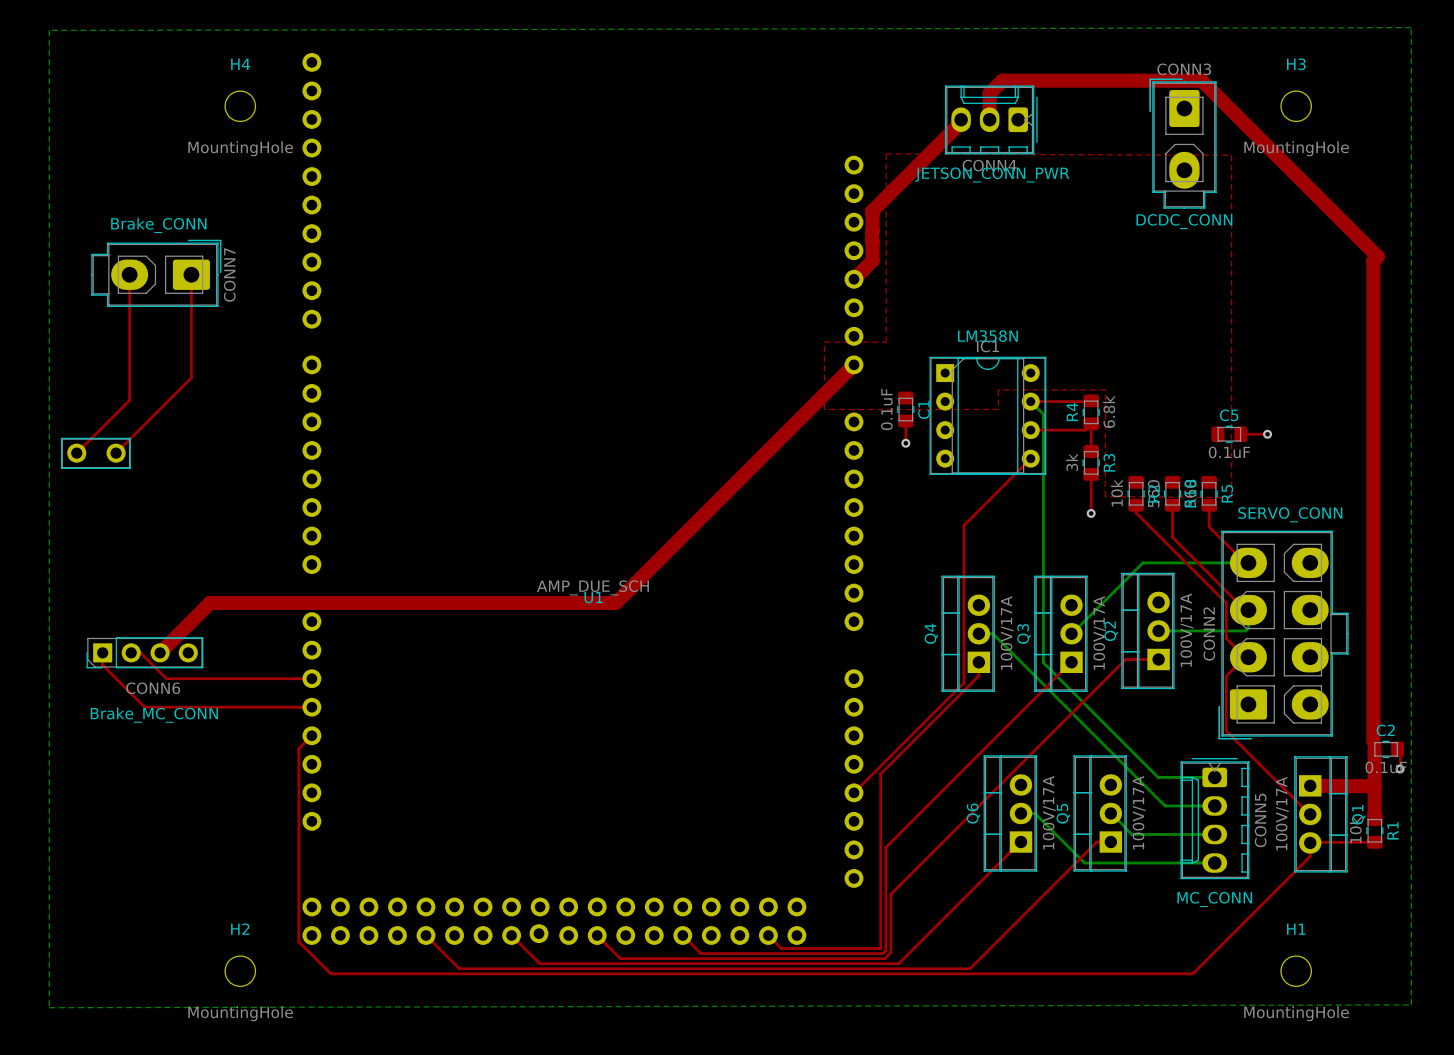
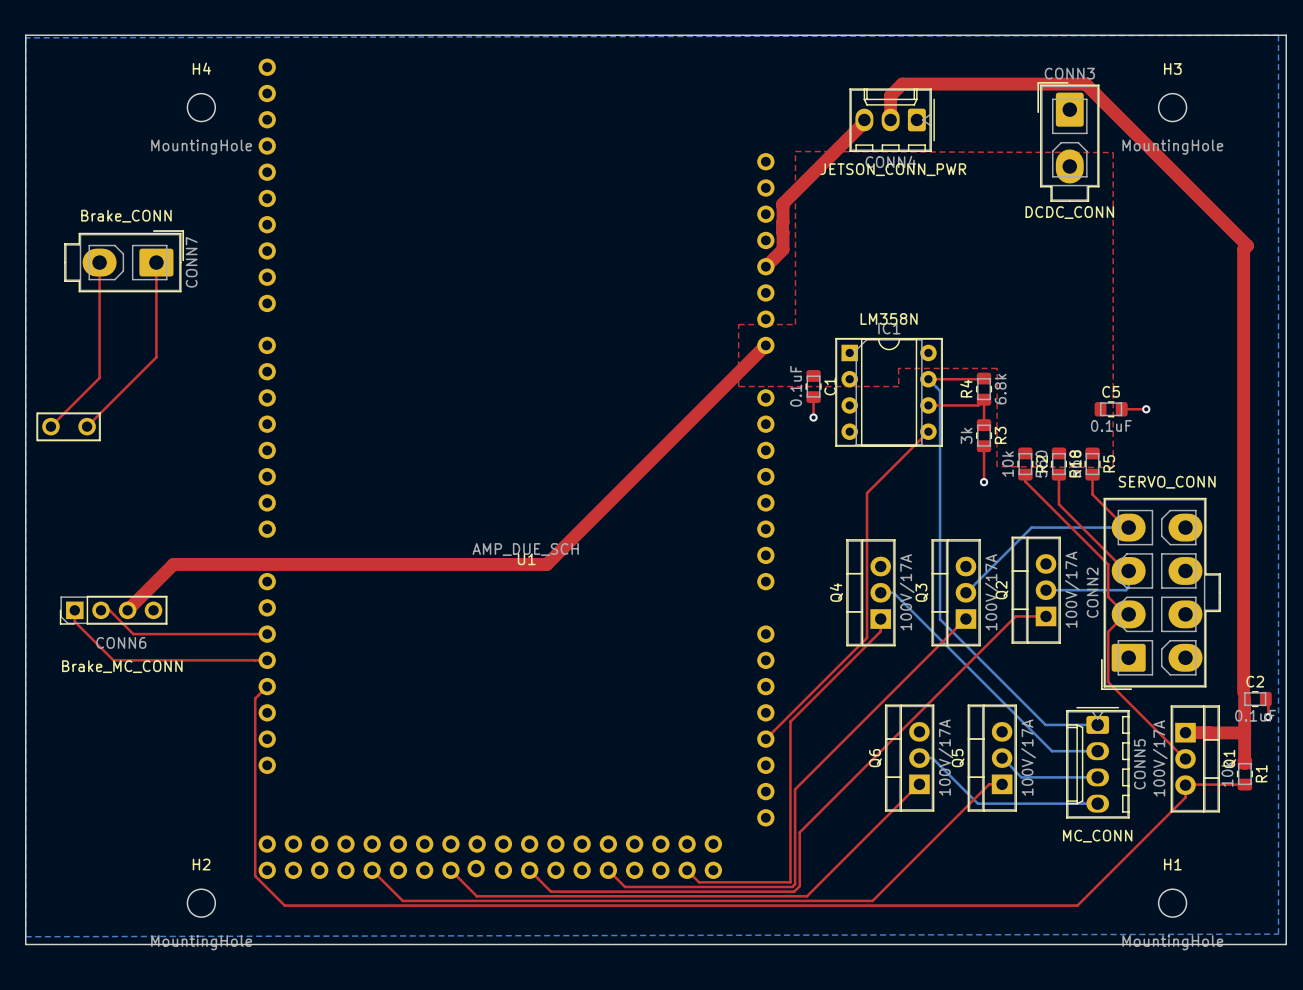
board edge: none -> (25, 35) (1286, 35) (1286, 944) (25, 944) (25, 35)

